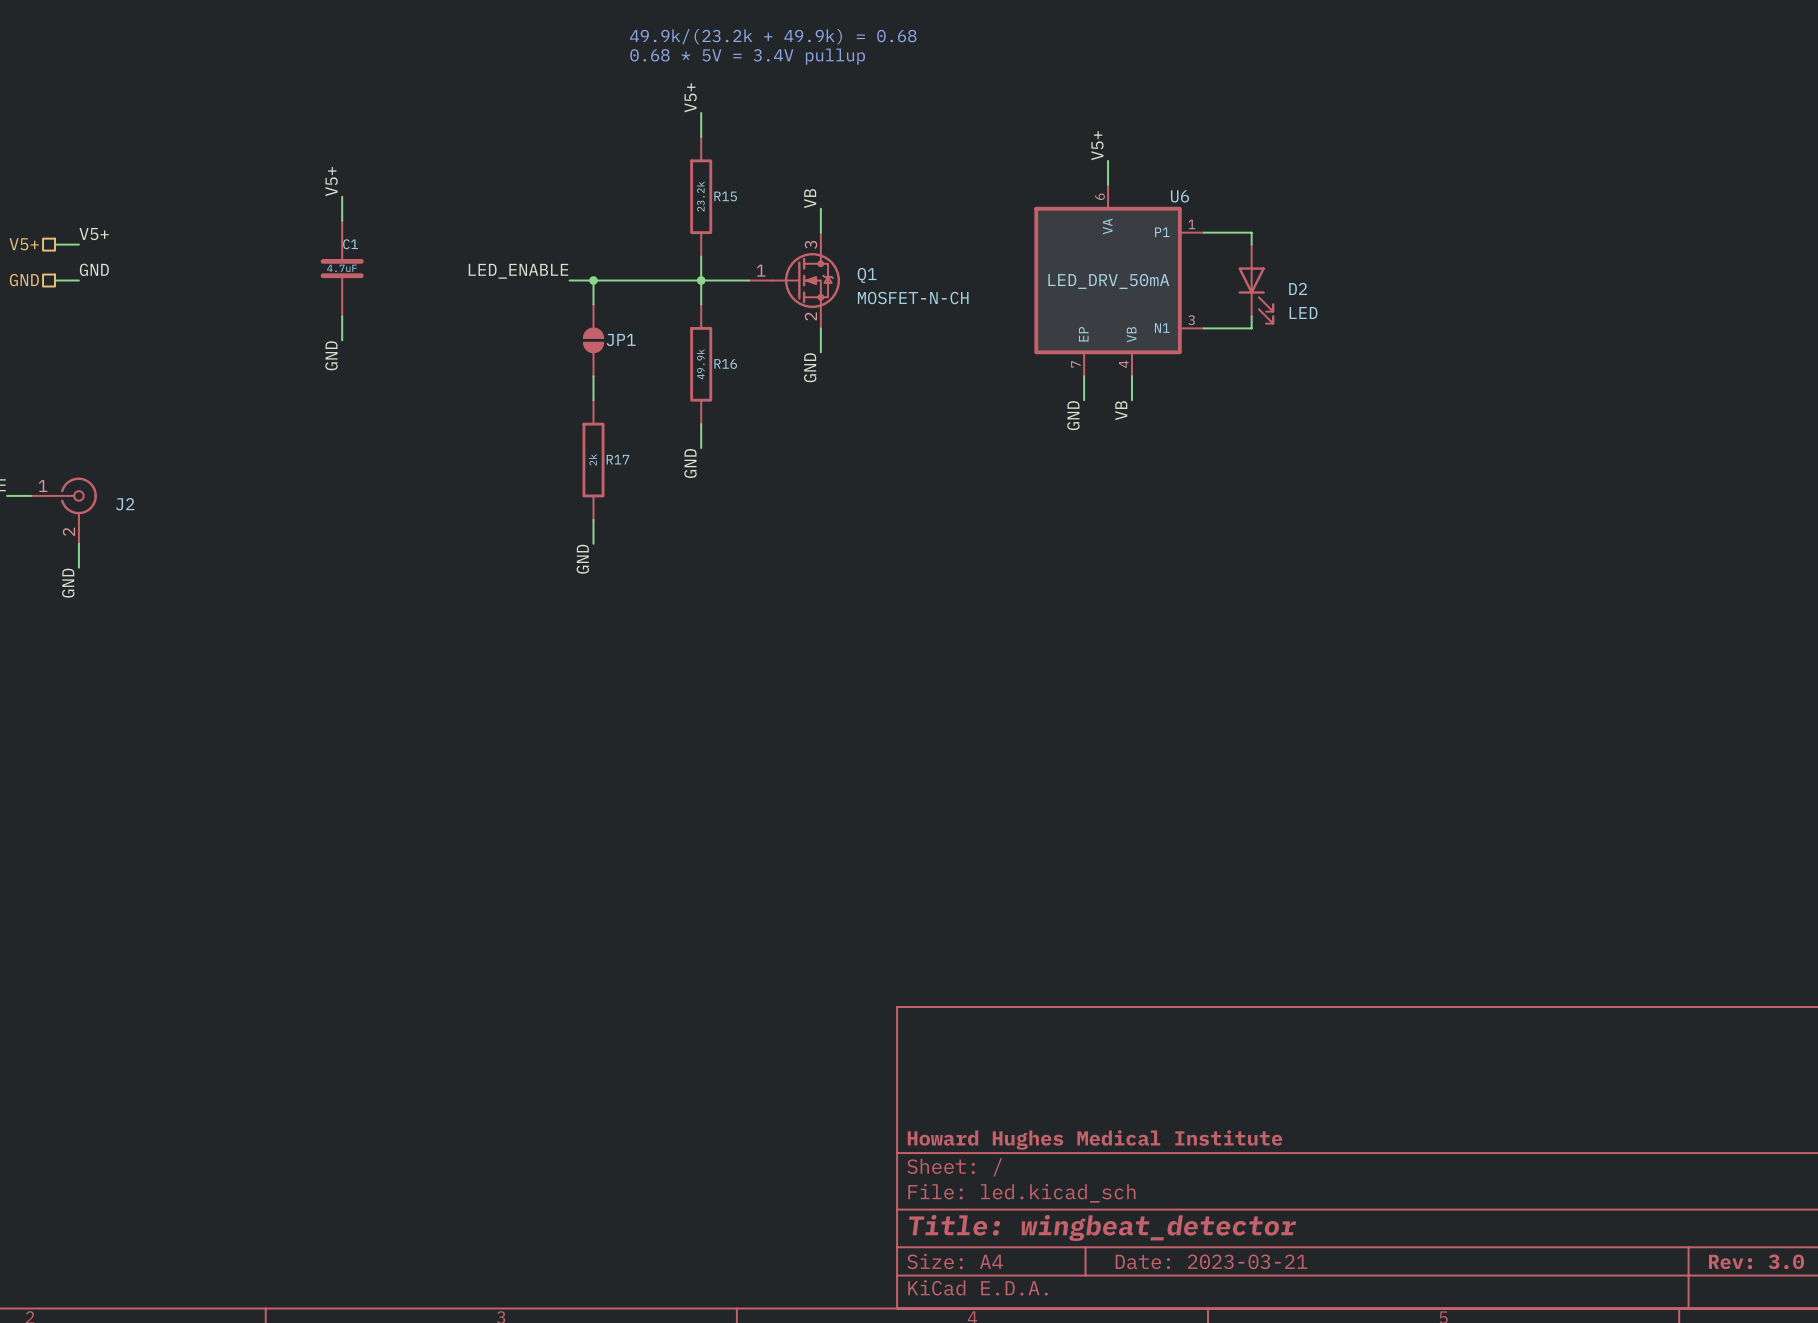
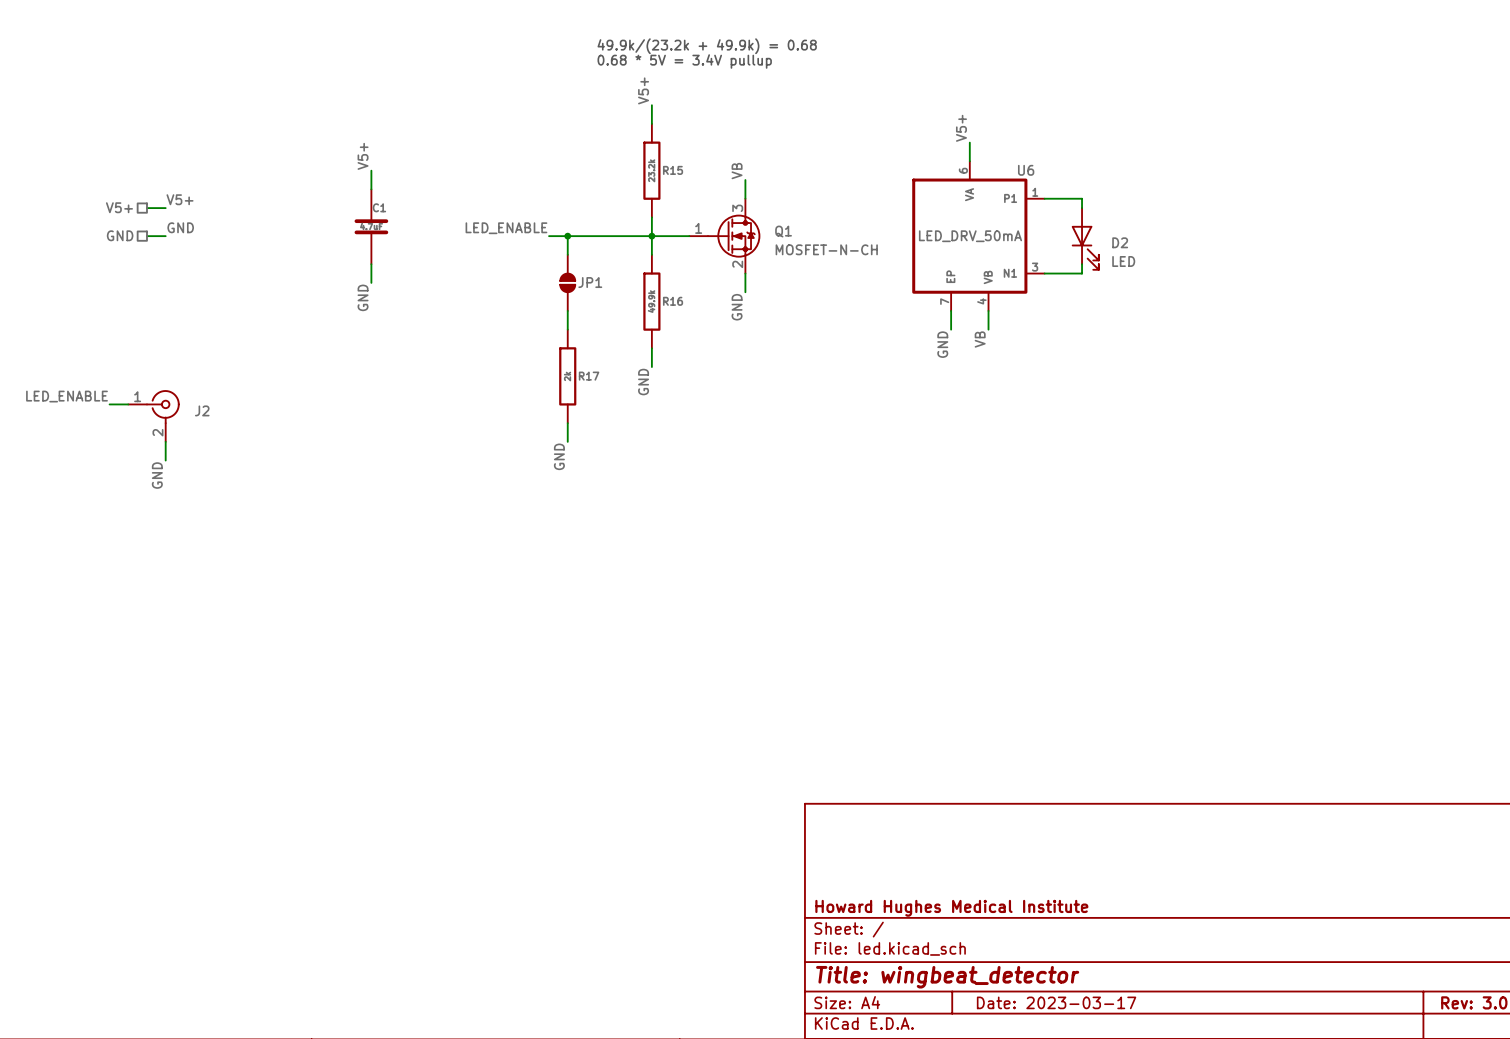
title block: Date: 2023-03-21 (1211, 1261) -> Date: 2023-03-17 (1056, 1002)

